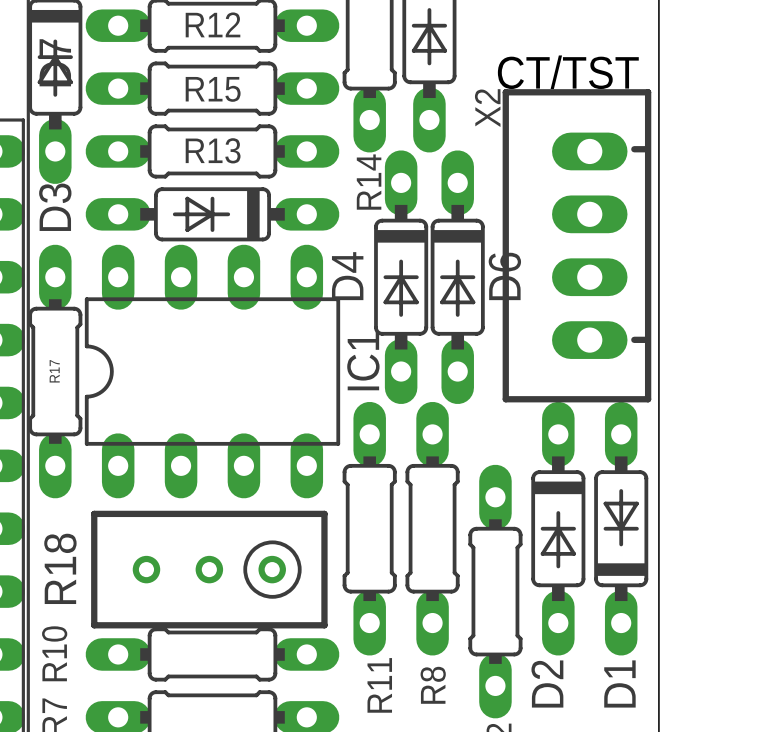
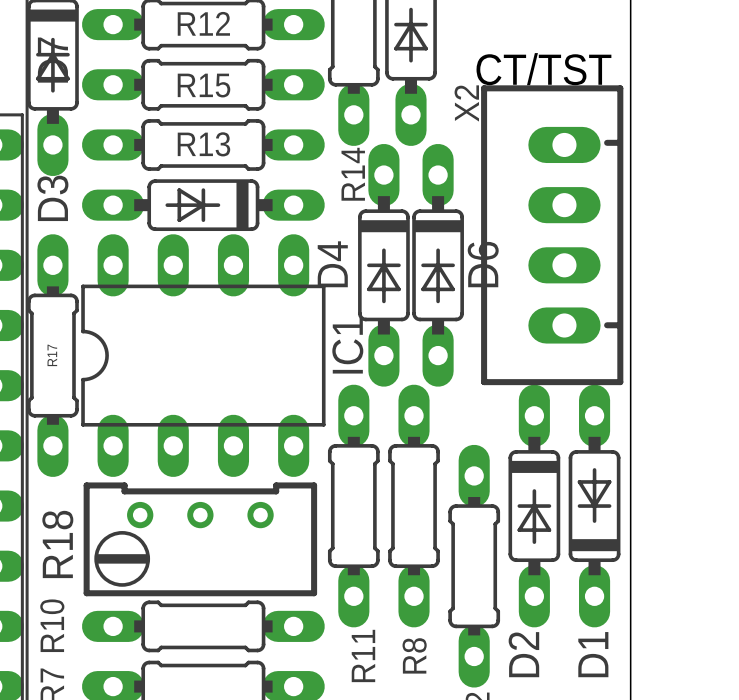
R18 footprint: [91, 510, 328, 629] -> [83, 482, 318, 597]

